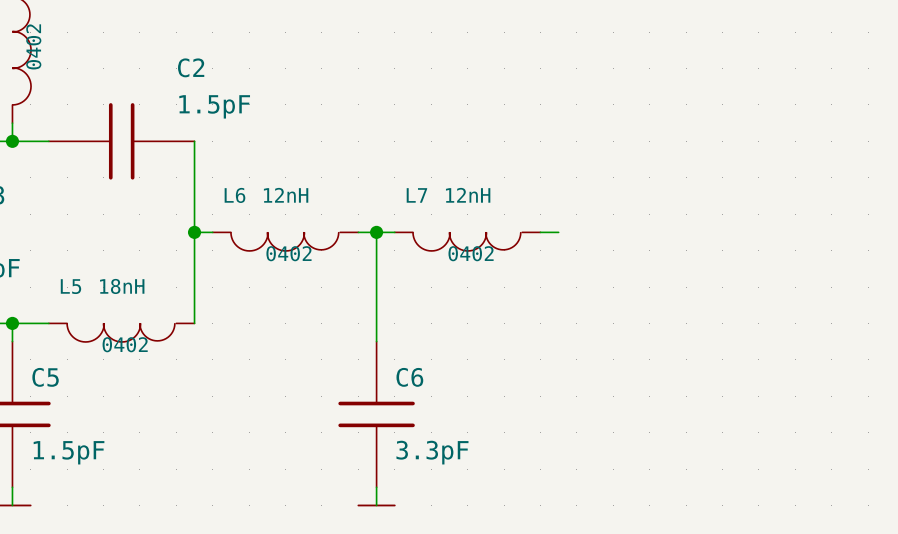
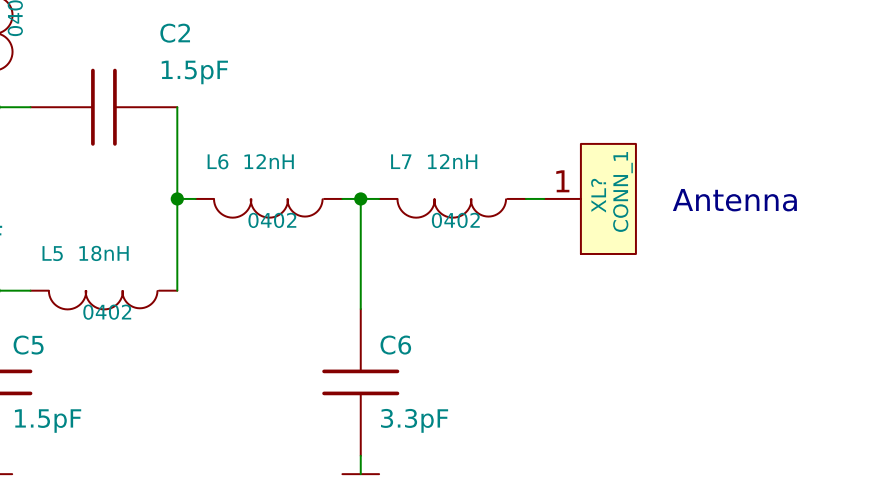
XL?: none -> CONN_1 (590, 198)
text: none -> Antenna (734, 200)

